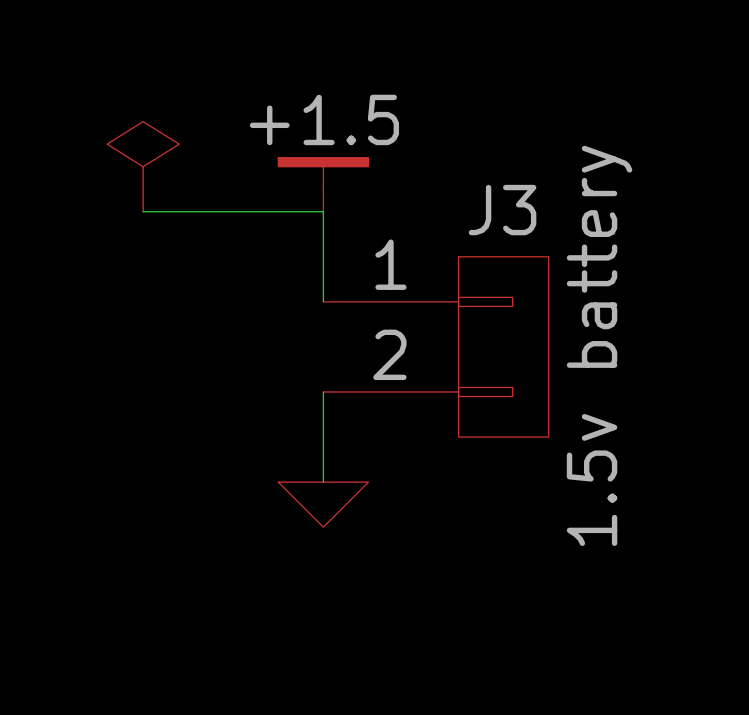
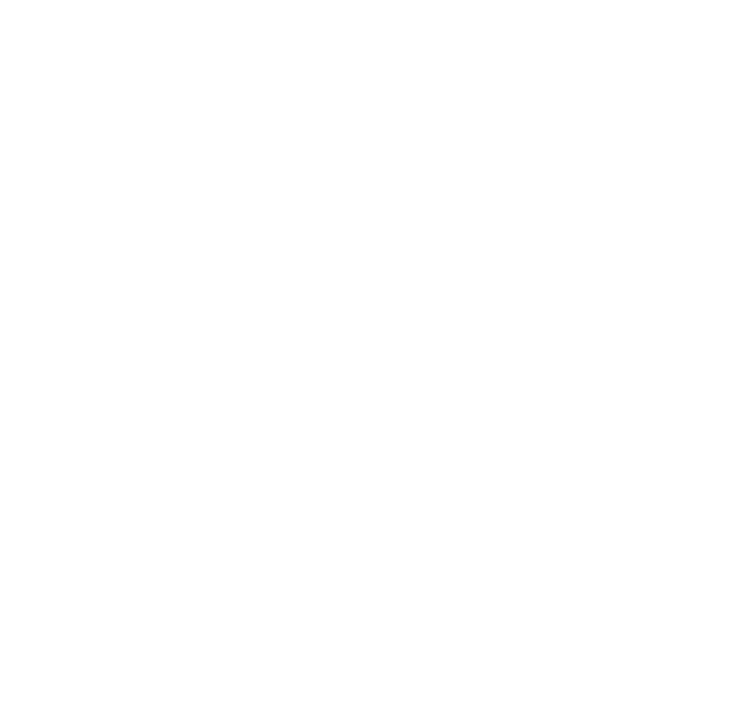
power symbol: (143, 166) -> none
power symbol: +1.5 (323, 184) -> none
wire: (143, 211) (323, 211) (323, 301) -> none
J3: 1.5v battery (436, 346) -> none
wire: (323, 391) (323, 482) -> none
power symbol: (323, 504) -> none

